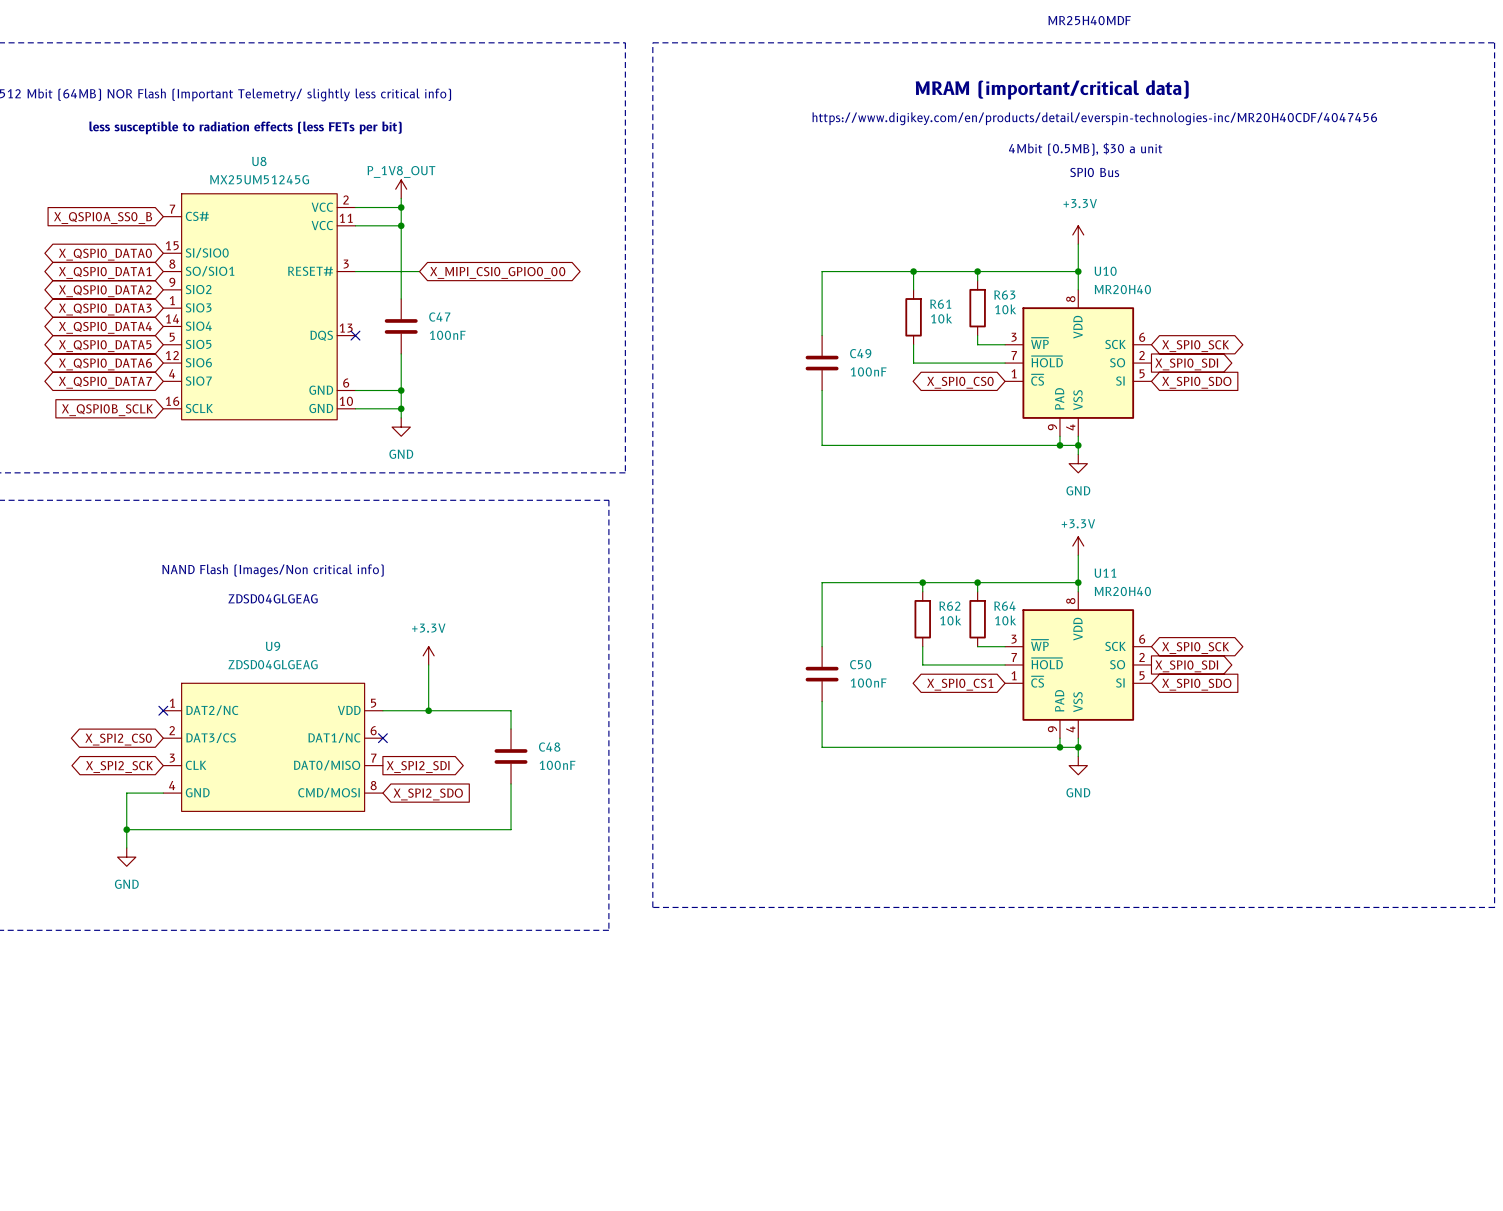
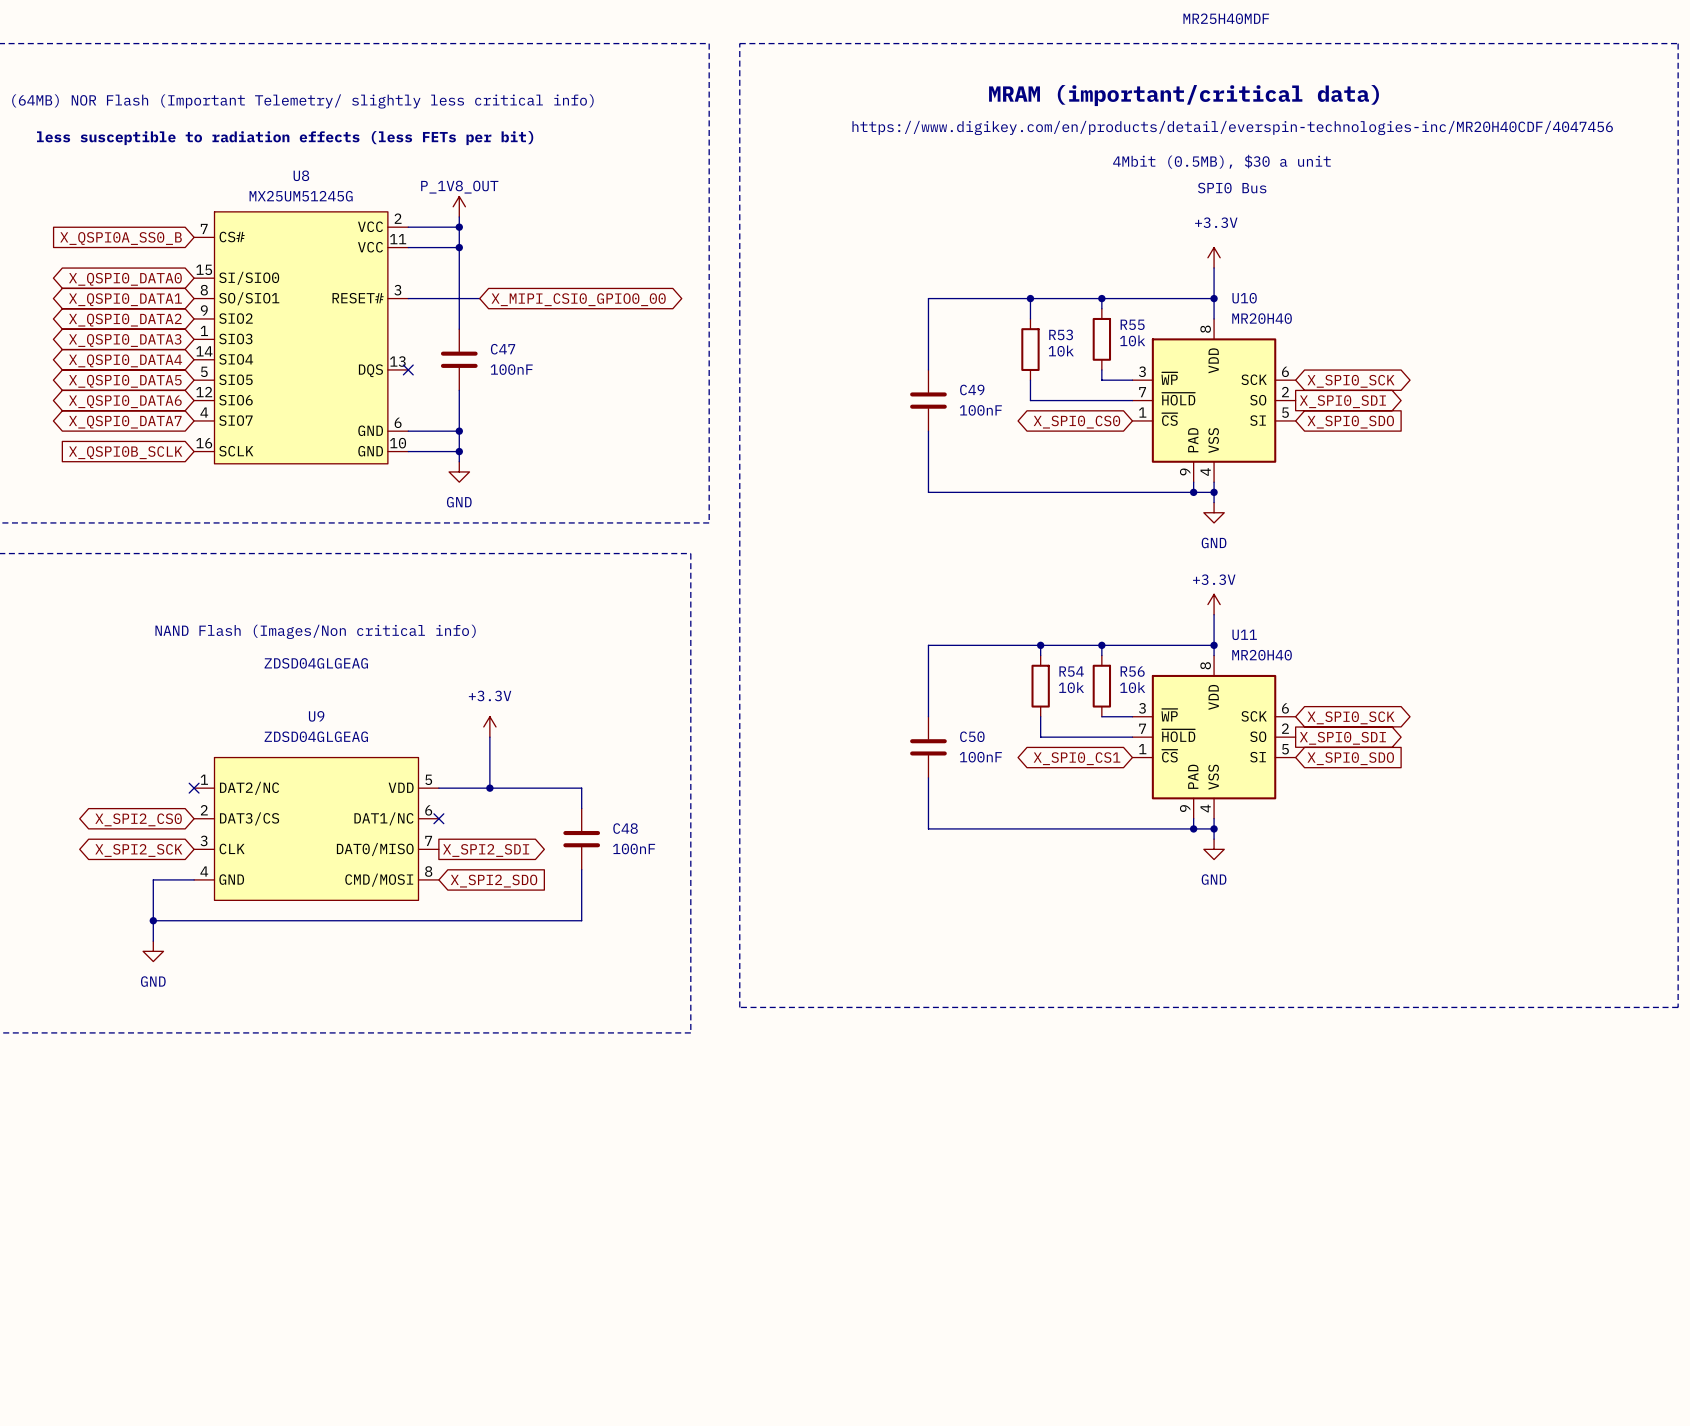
R63 name: R63 (1004, 295) -> R55 (1132, 324)
R61 name: R61 (940, 304) -> R53 (1061, 334)
R62 name: R62 (949, 606) -> R54 (1071, 671)
R64 name: R64 (1004, 606) -> R56 (1132, 671)

